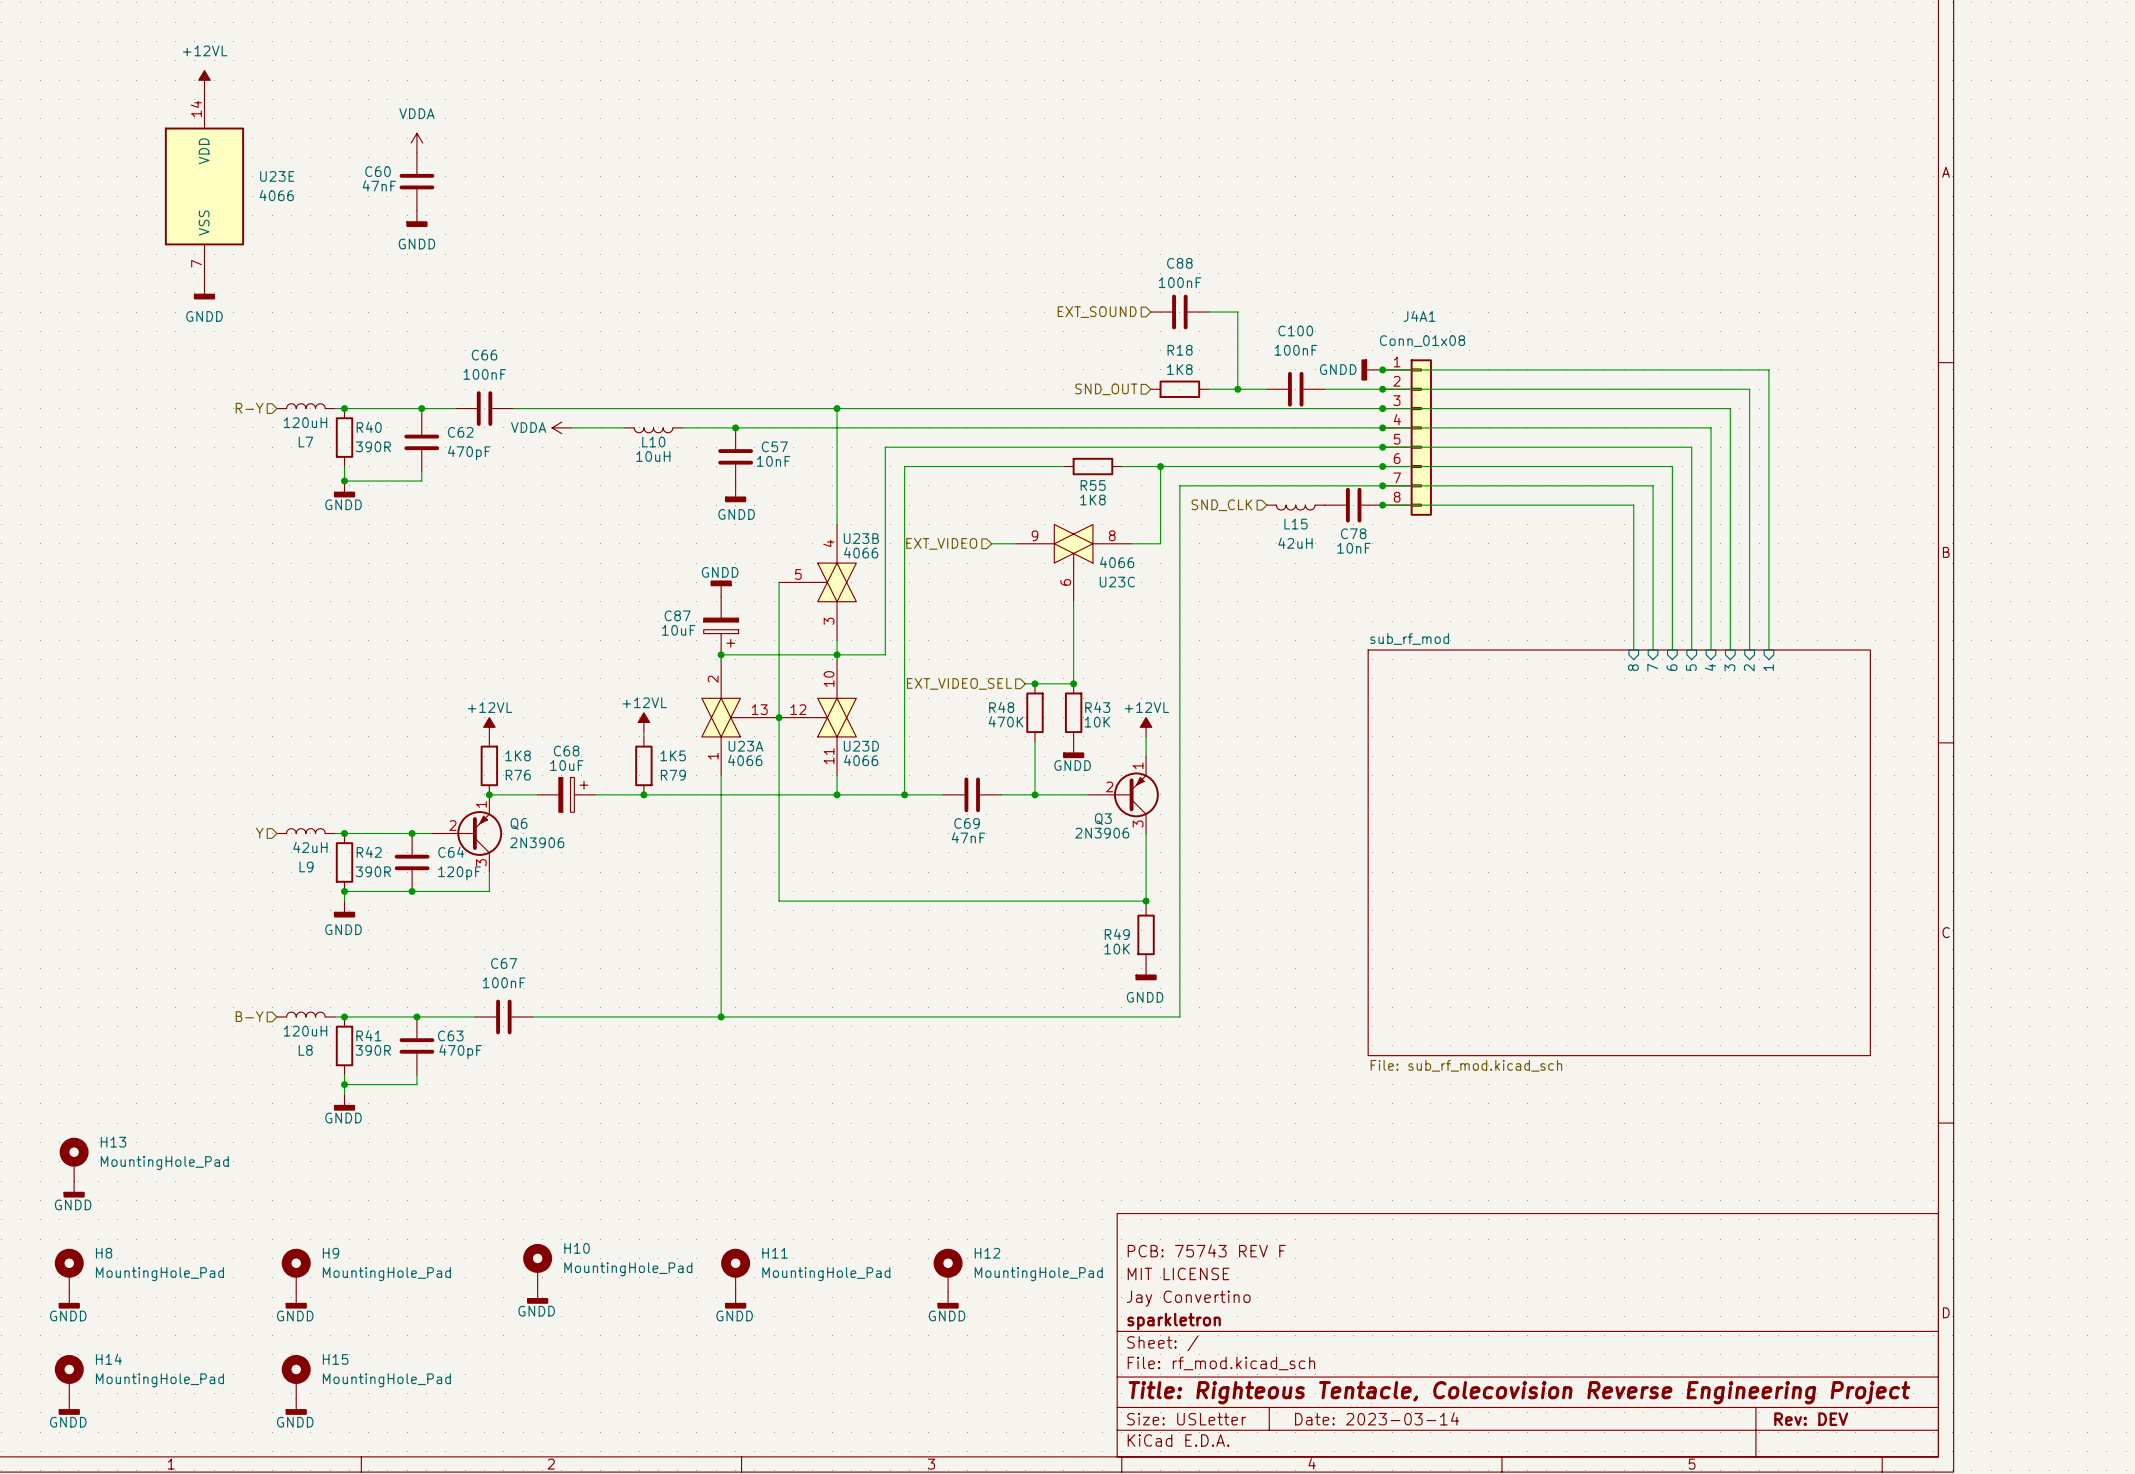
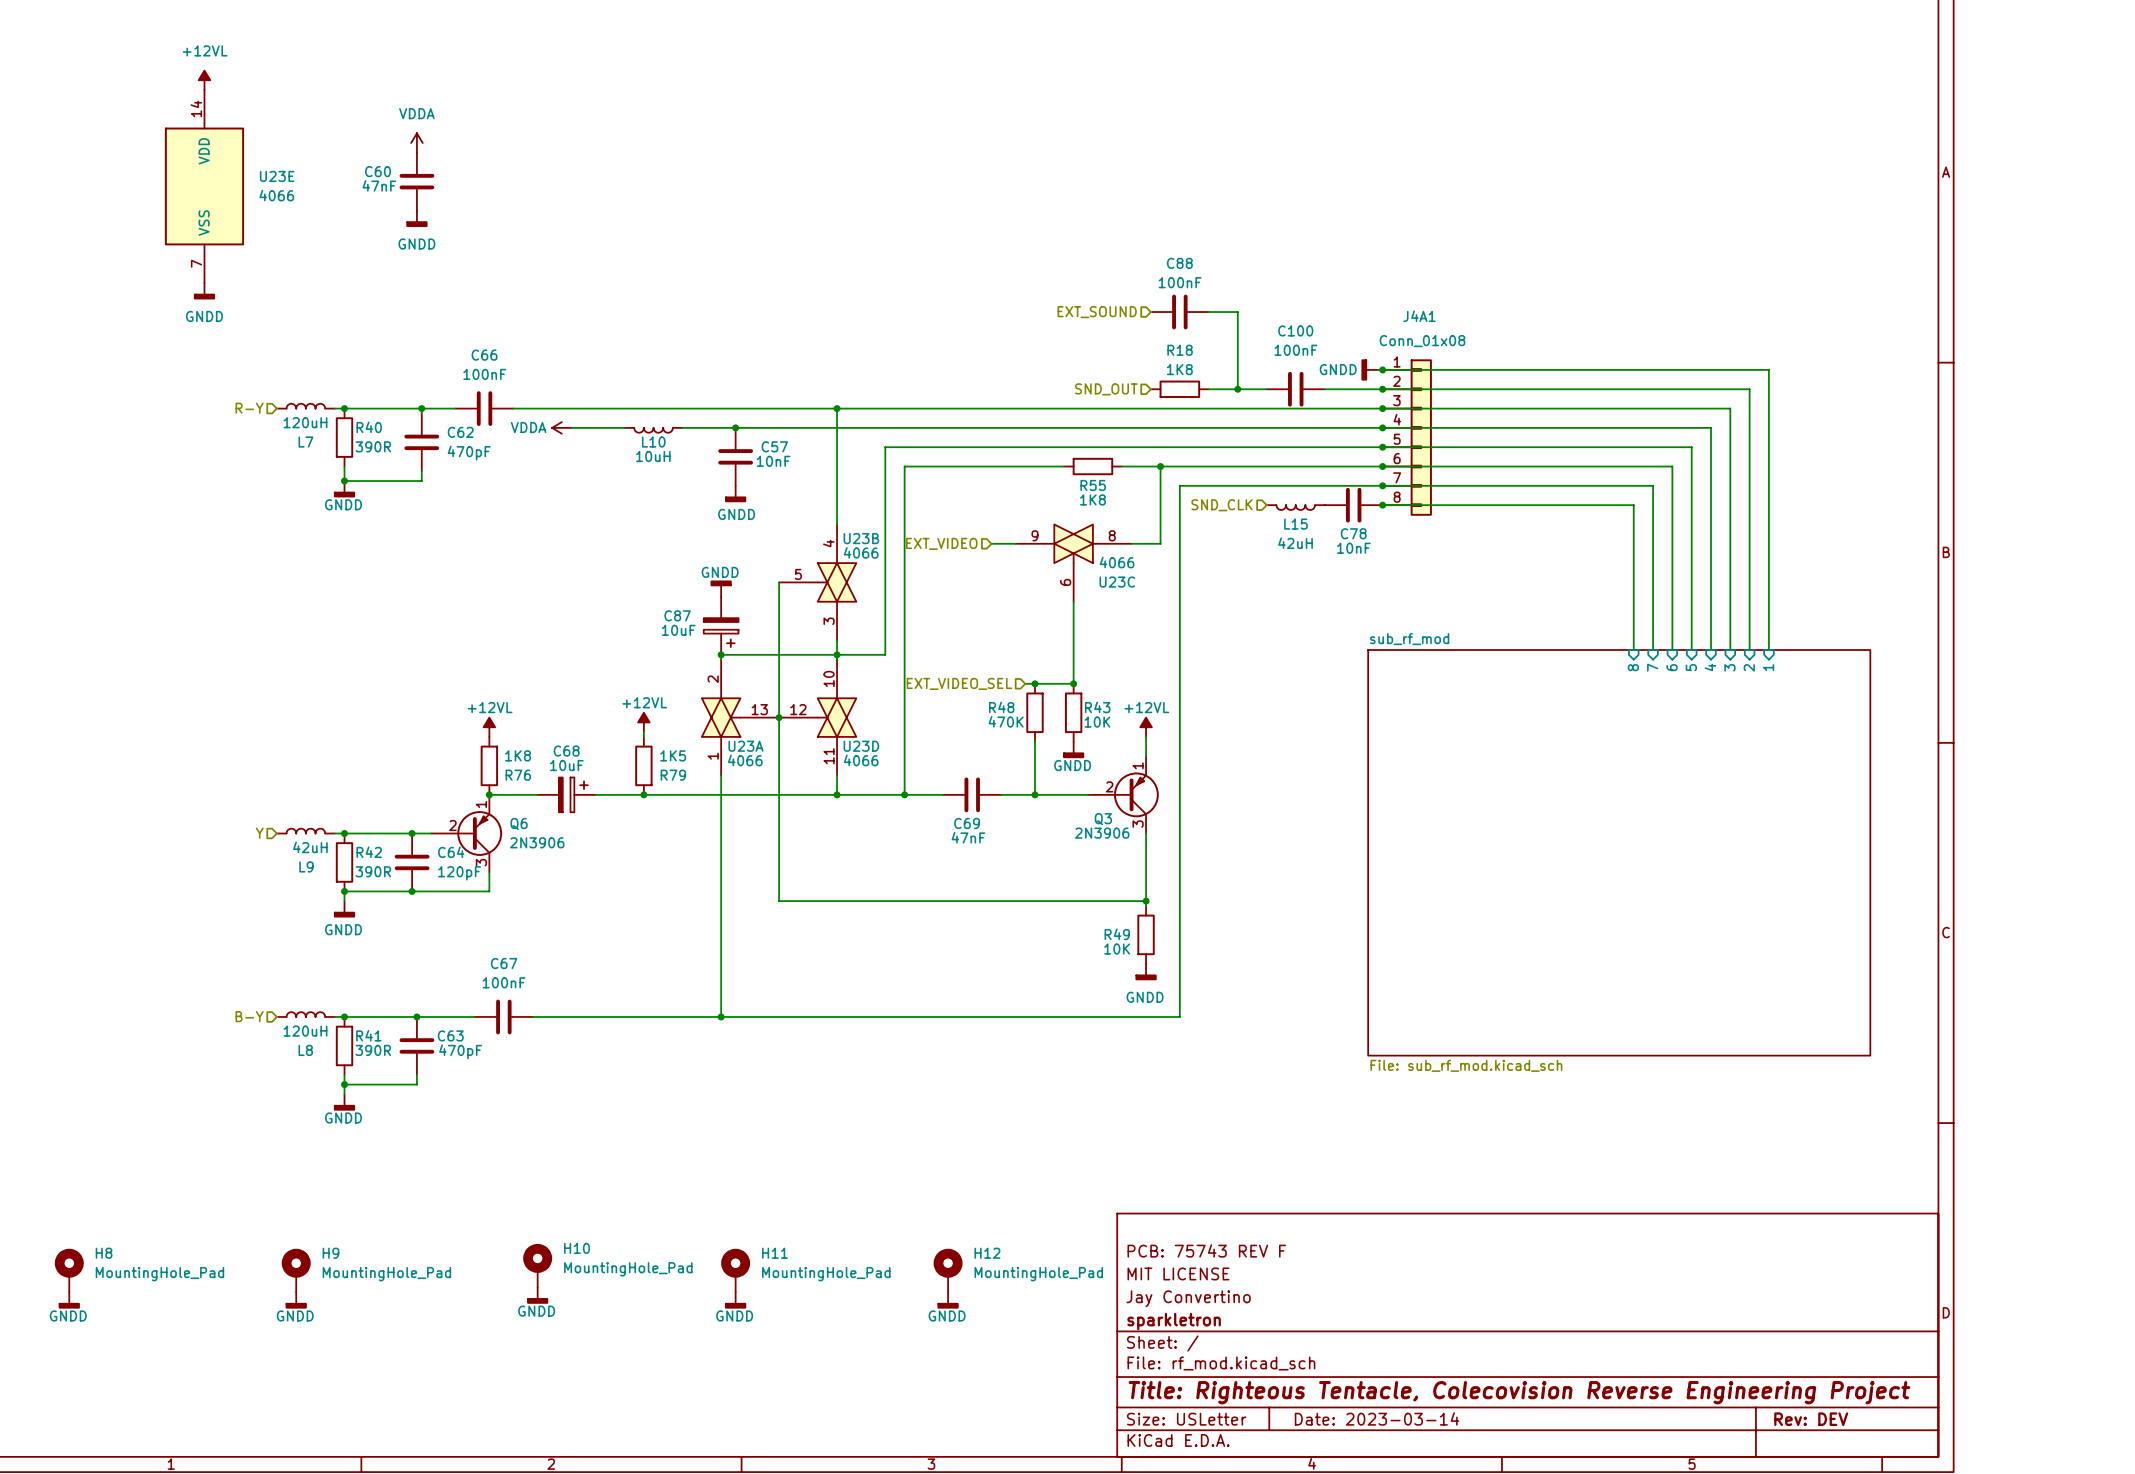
H13: MountingHole_Pad (74, 1159) -> none
power symbol: GNDD (74, 1189) -> none
H14: MountingHole_Pad (69, 1376) -> none
H15: MountingHole_Pad (296, 1376) -> none
power symbol: GNDD (69, 1406) -> none
power symbol: GNDD (296, 1406) -> none

